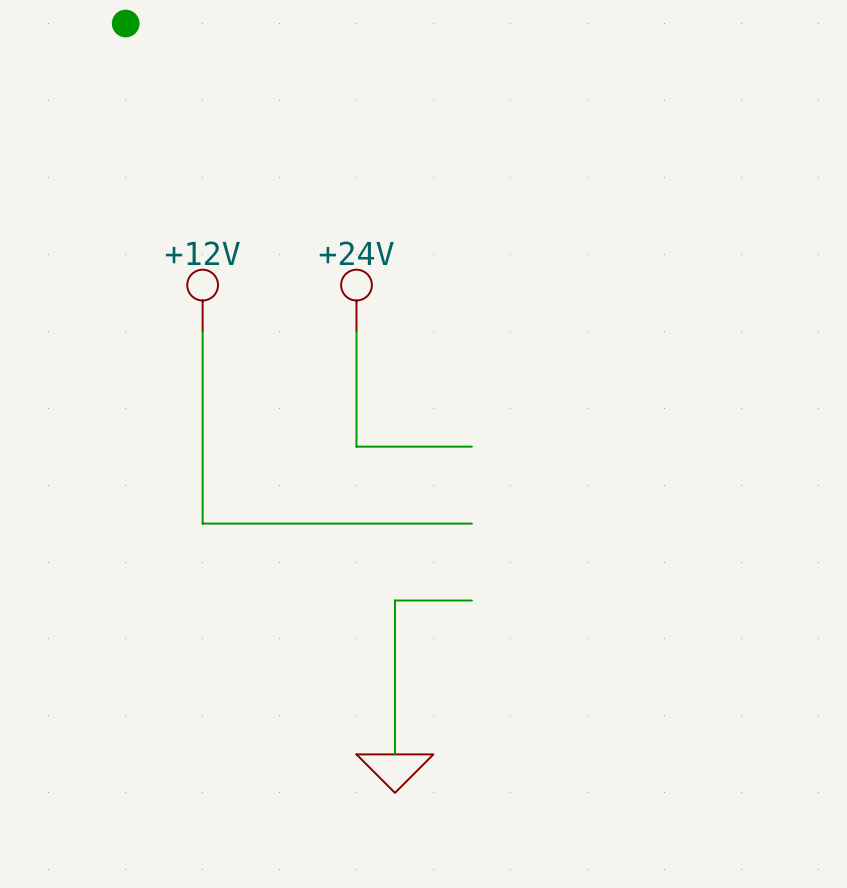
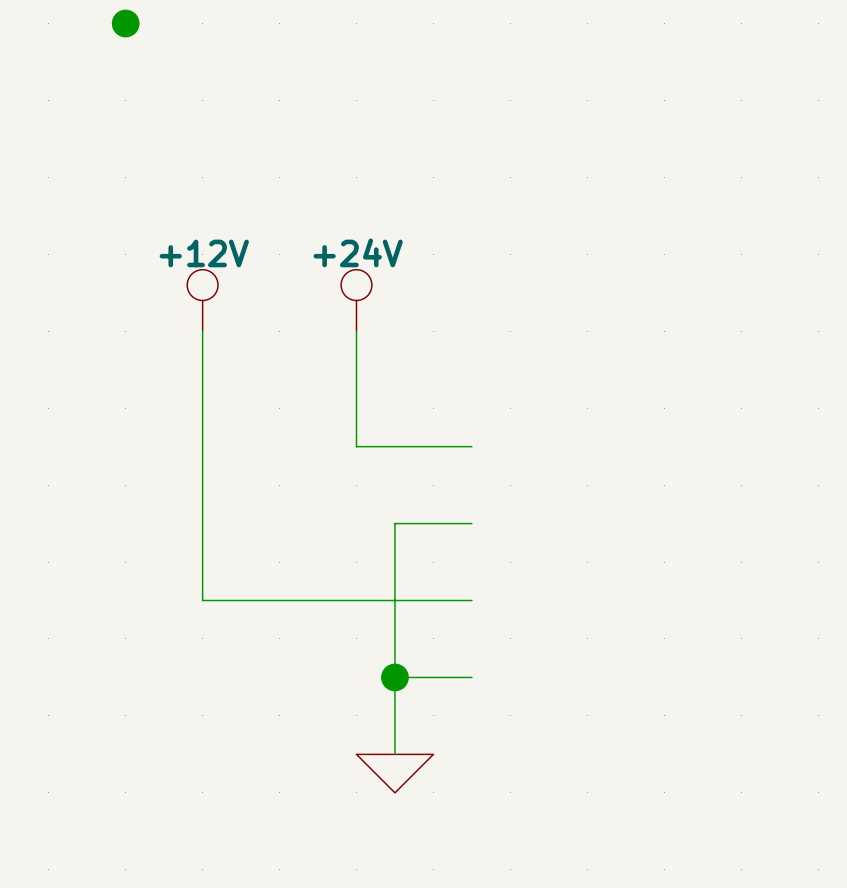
wire: (202, 523) (394, 523) -> (202, 523) (202, 600) (394, 600) (394, 523)
wire: none -> (394, 677) (471, 677)
junction: none -> (394, 677)

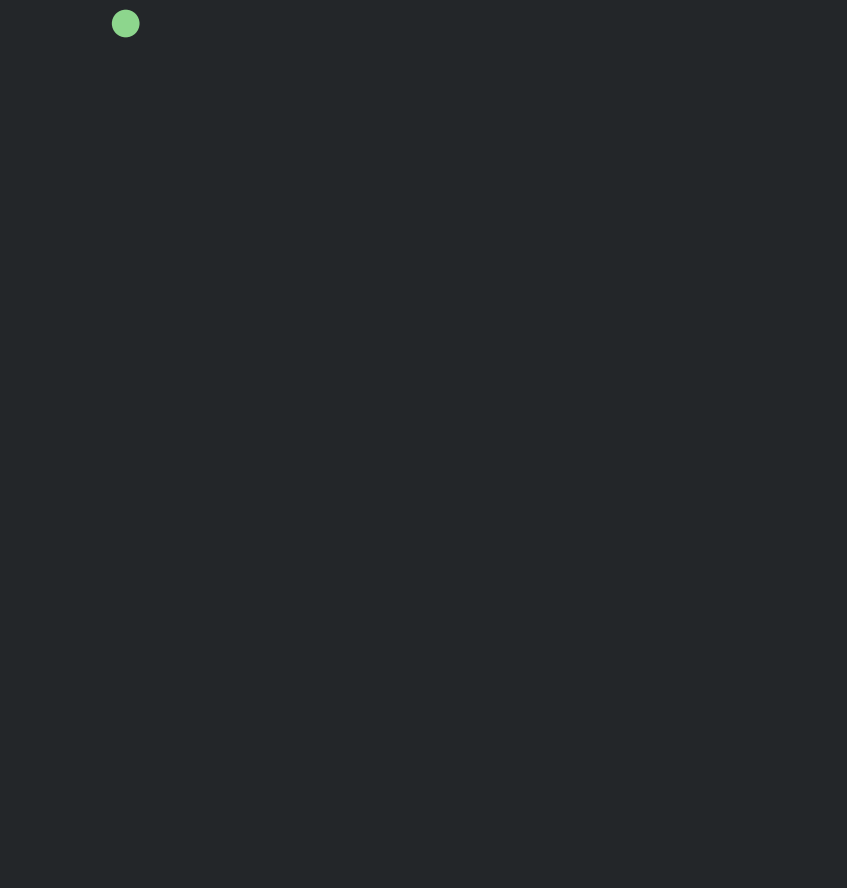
power symbol: +12V (202, 300) -> none
power symbol: +24V (356, 300) -> none
wire: (202, 331) (202, 600) (471, 600) -> none
wire: (356, 331) (356, 446) (471, 446) -> none
wire: (471, 523) (394, 523) (394, 754) -> none
wire: (394, 677) (471, 677) -> none
junction: (394, 677) -> none
power symbol: (394, 773) -> none

